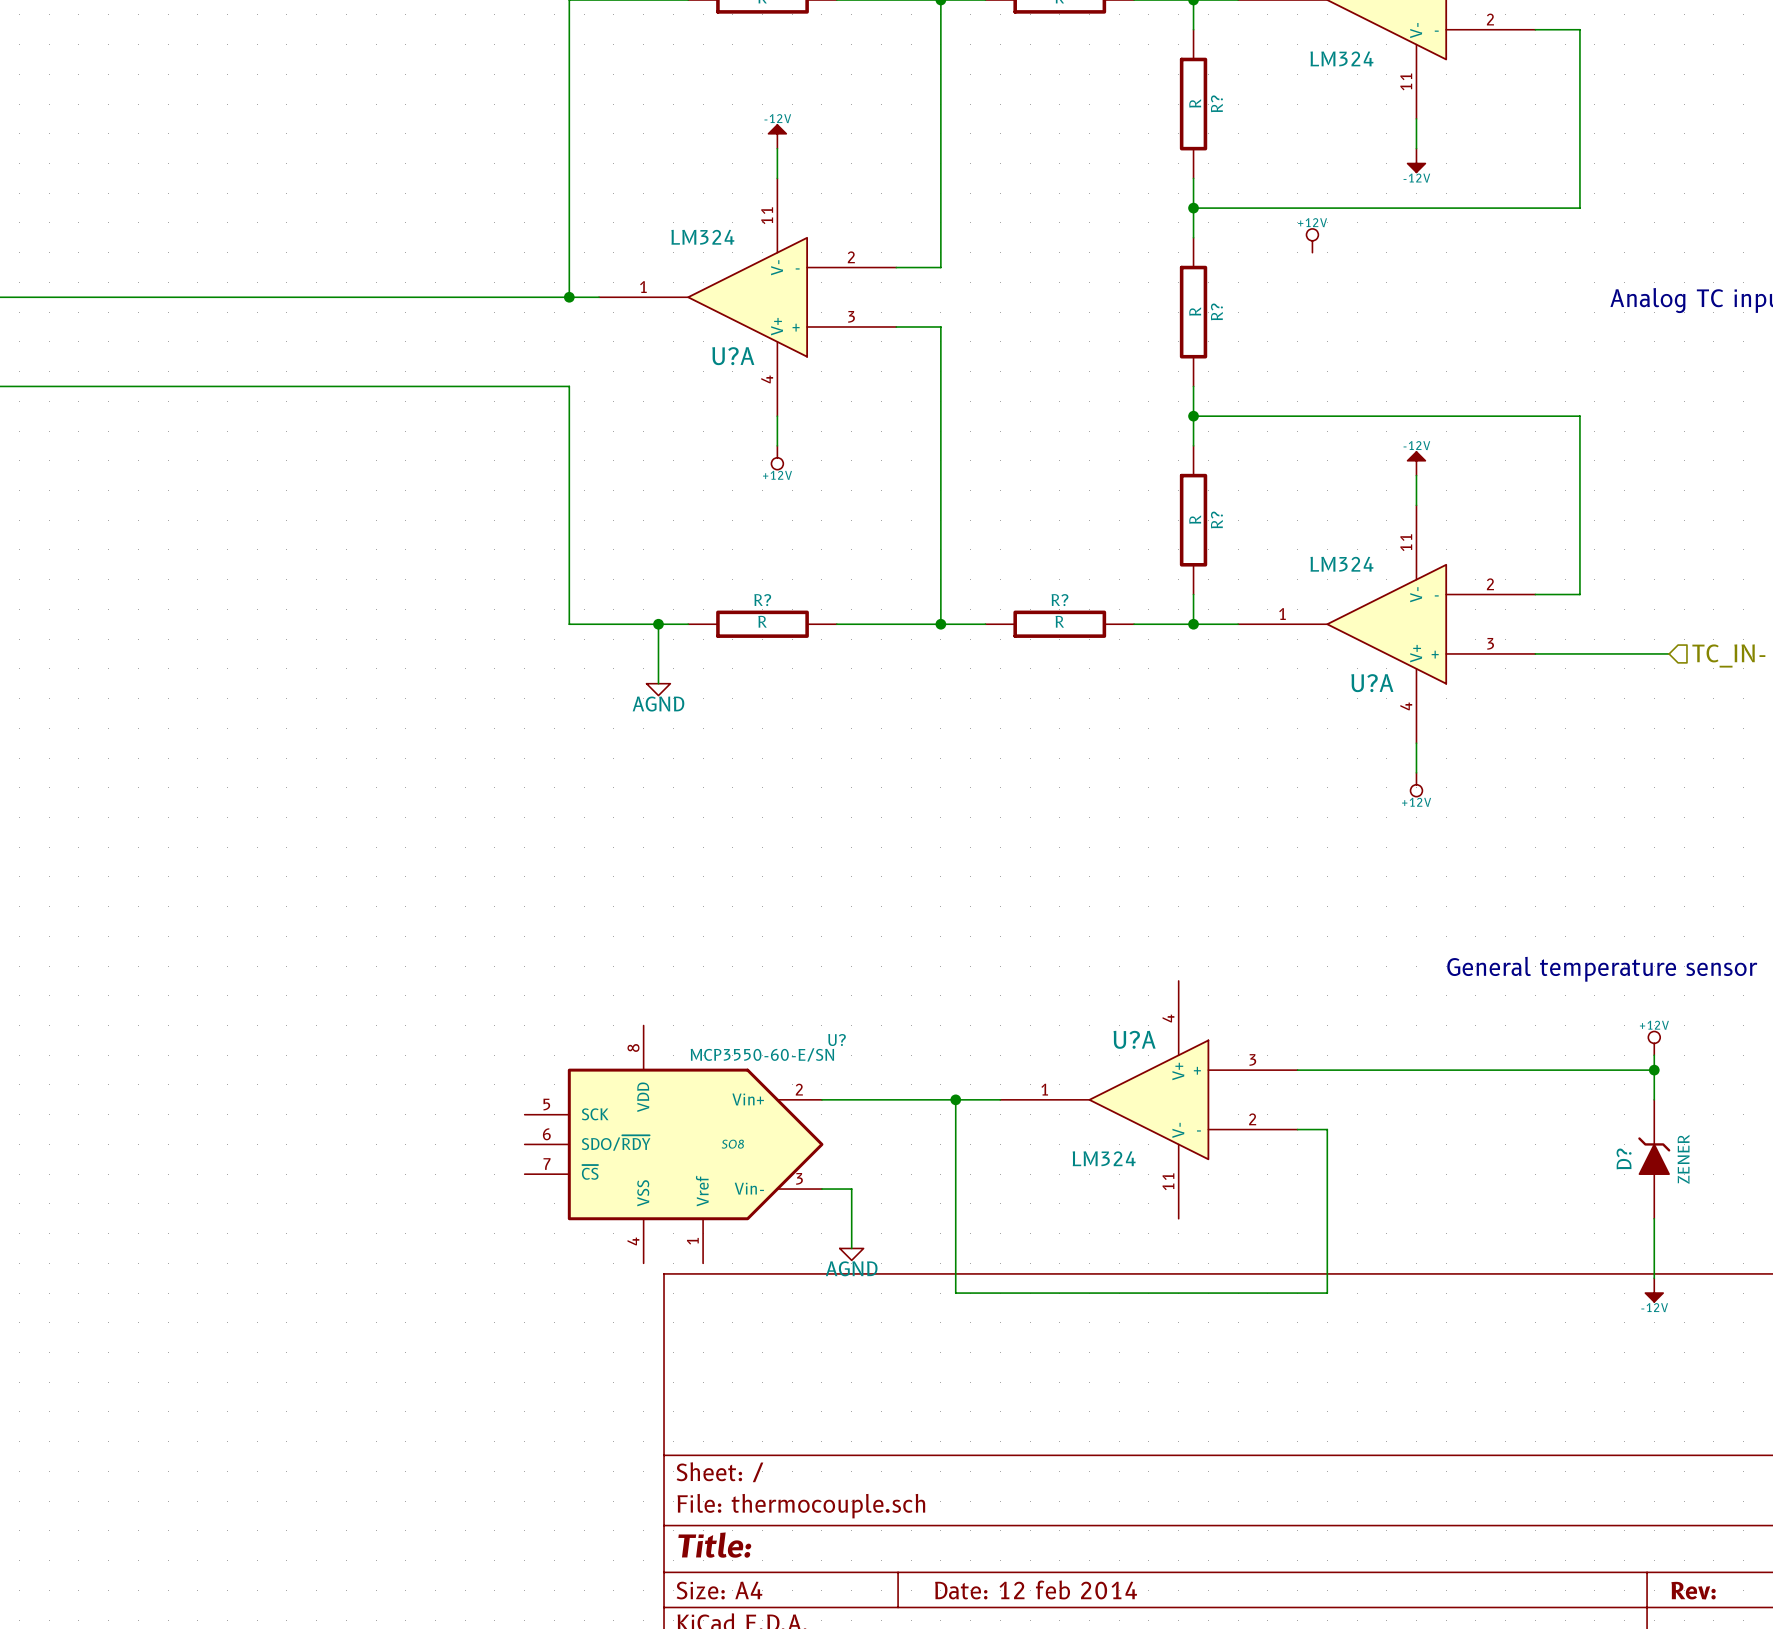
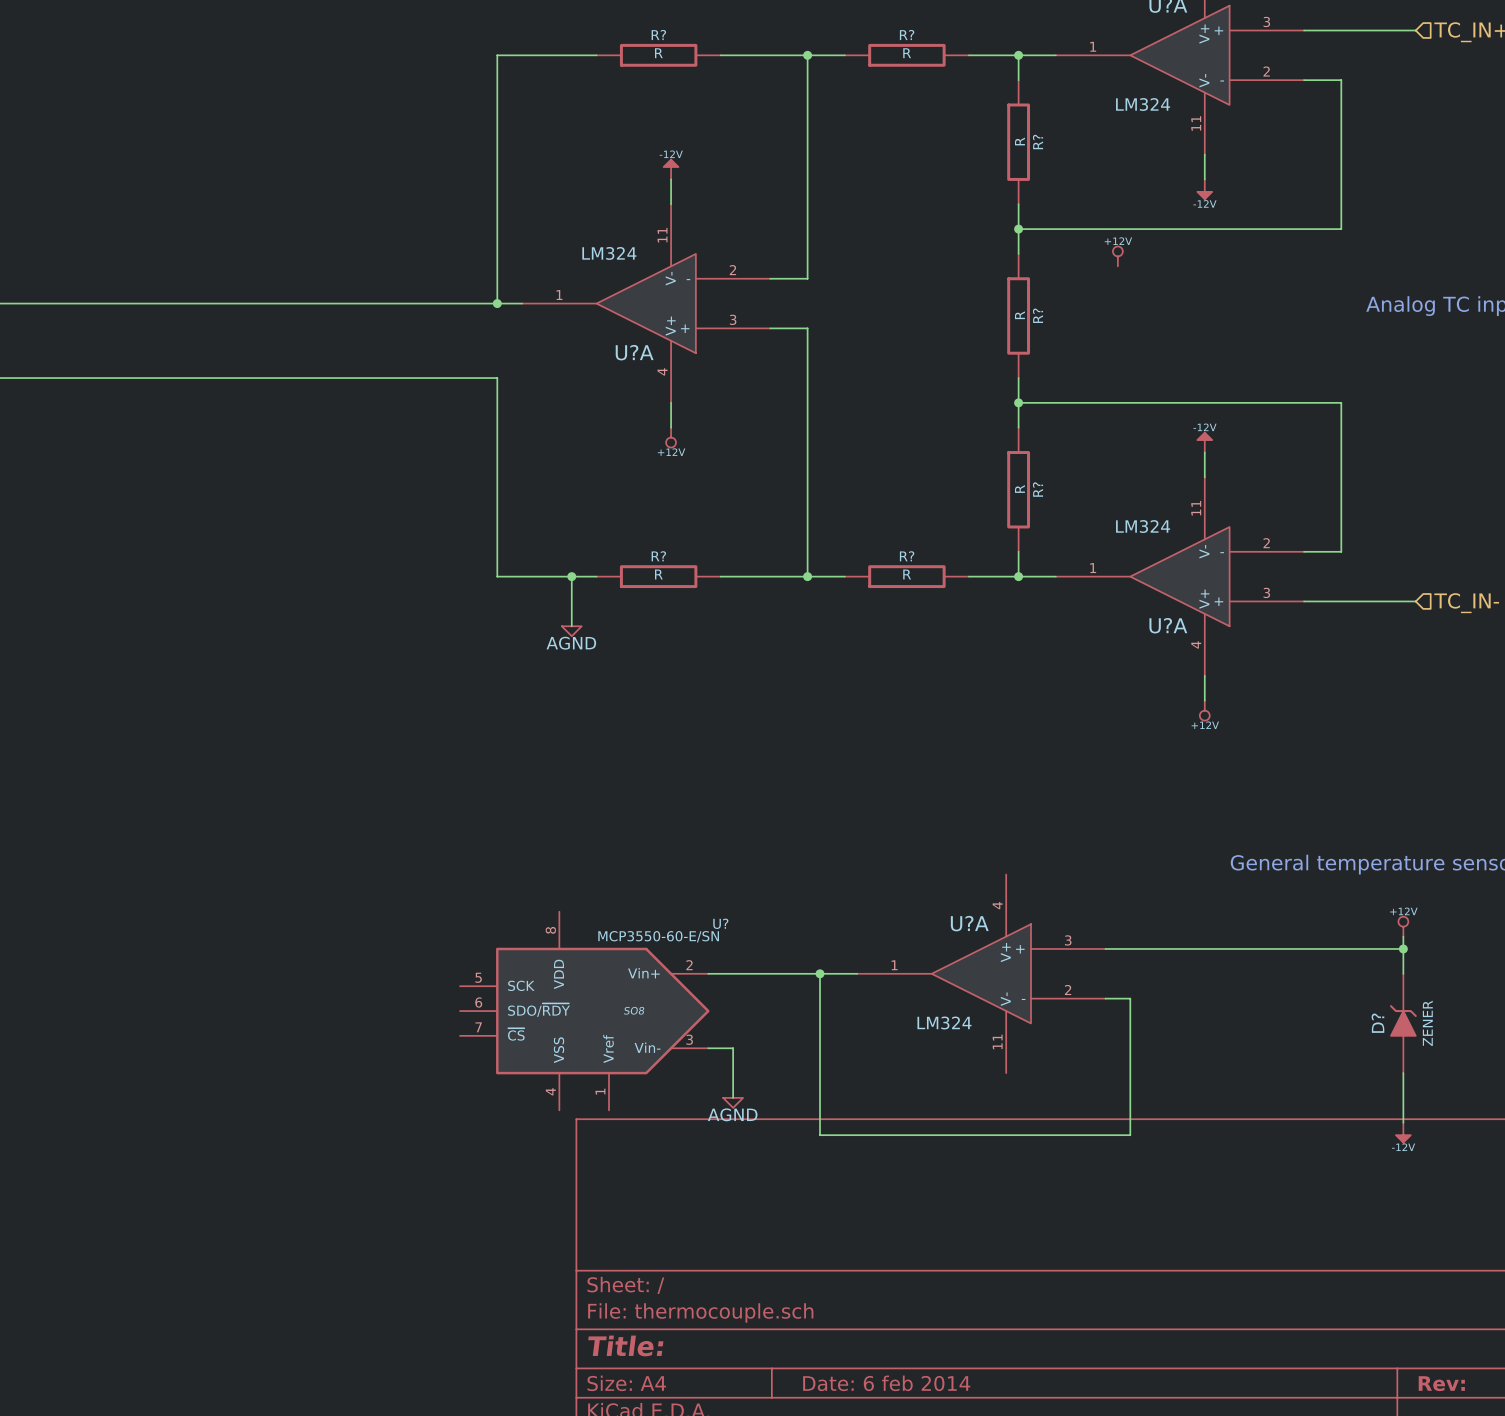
title block: Date: 12 feb 2014 (1036, 1589) -> Date: 6 feb 2014 (886, 1383)

